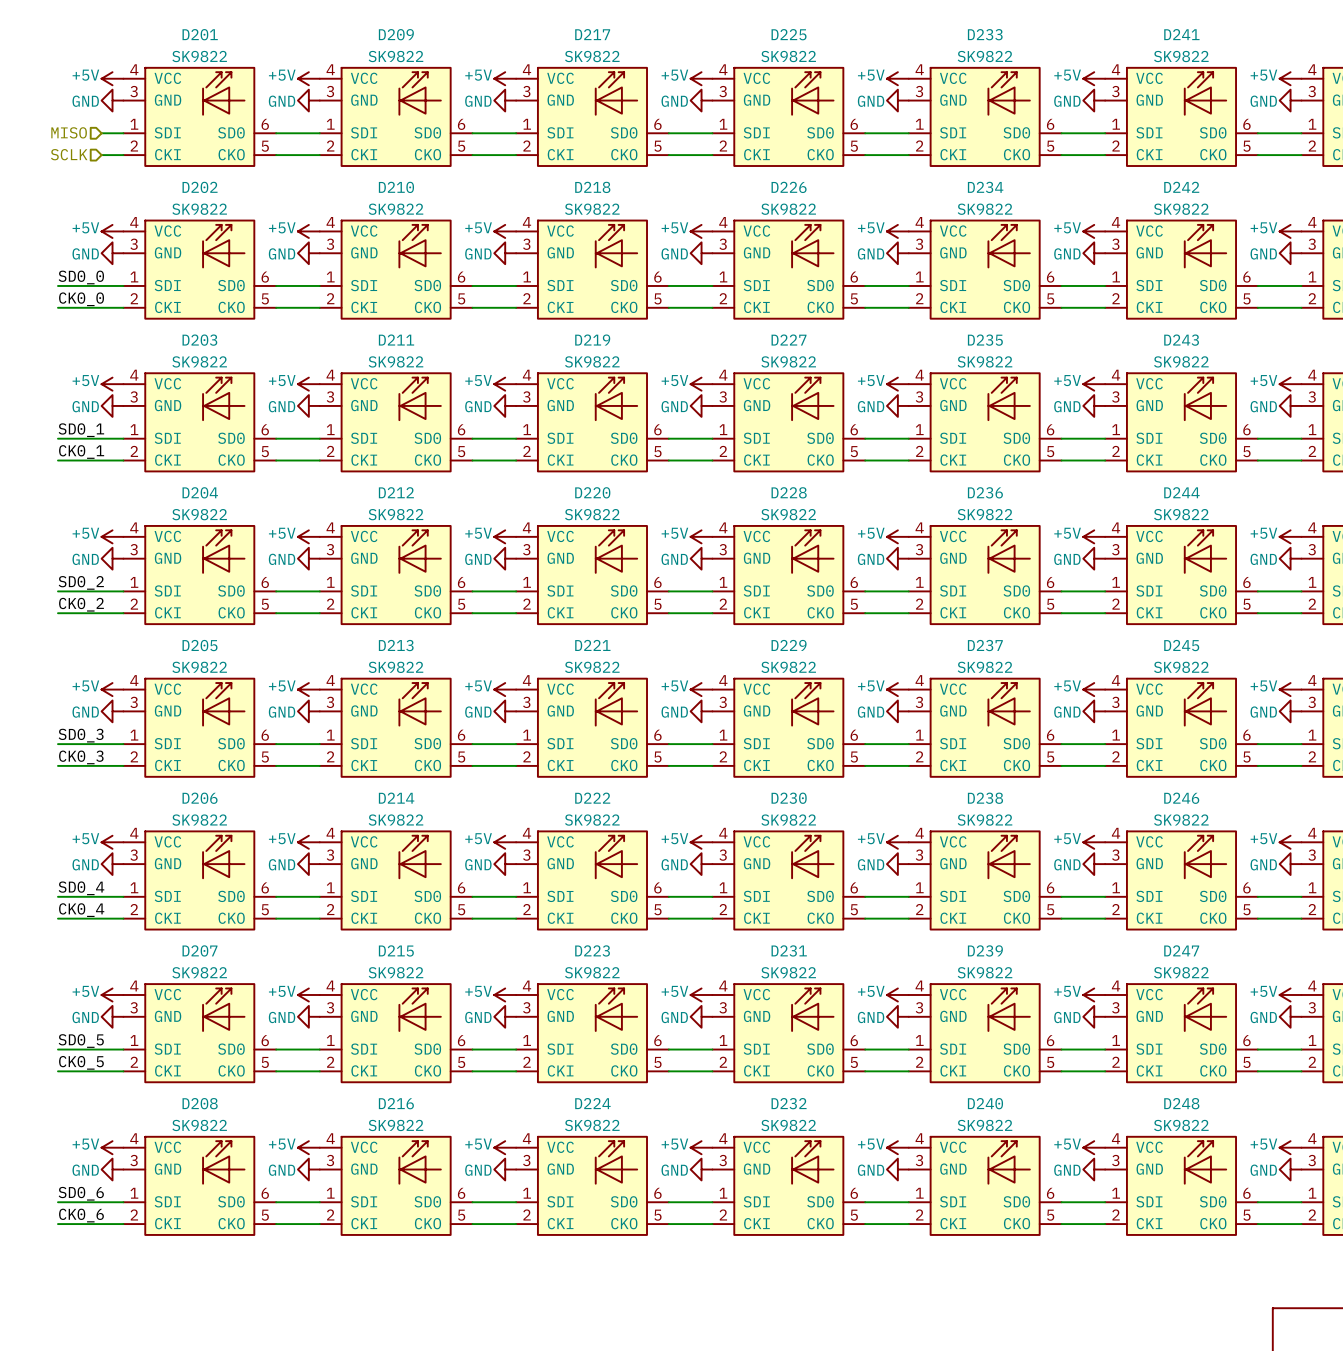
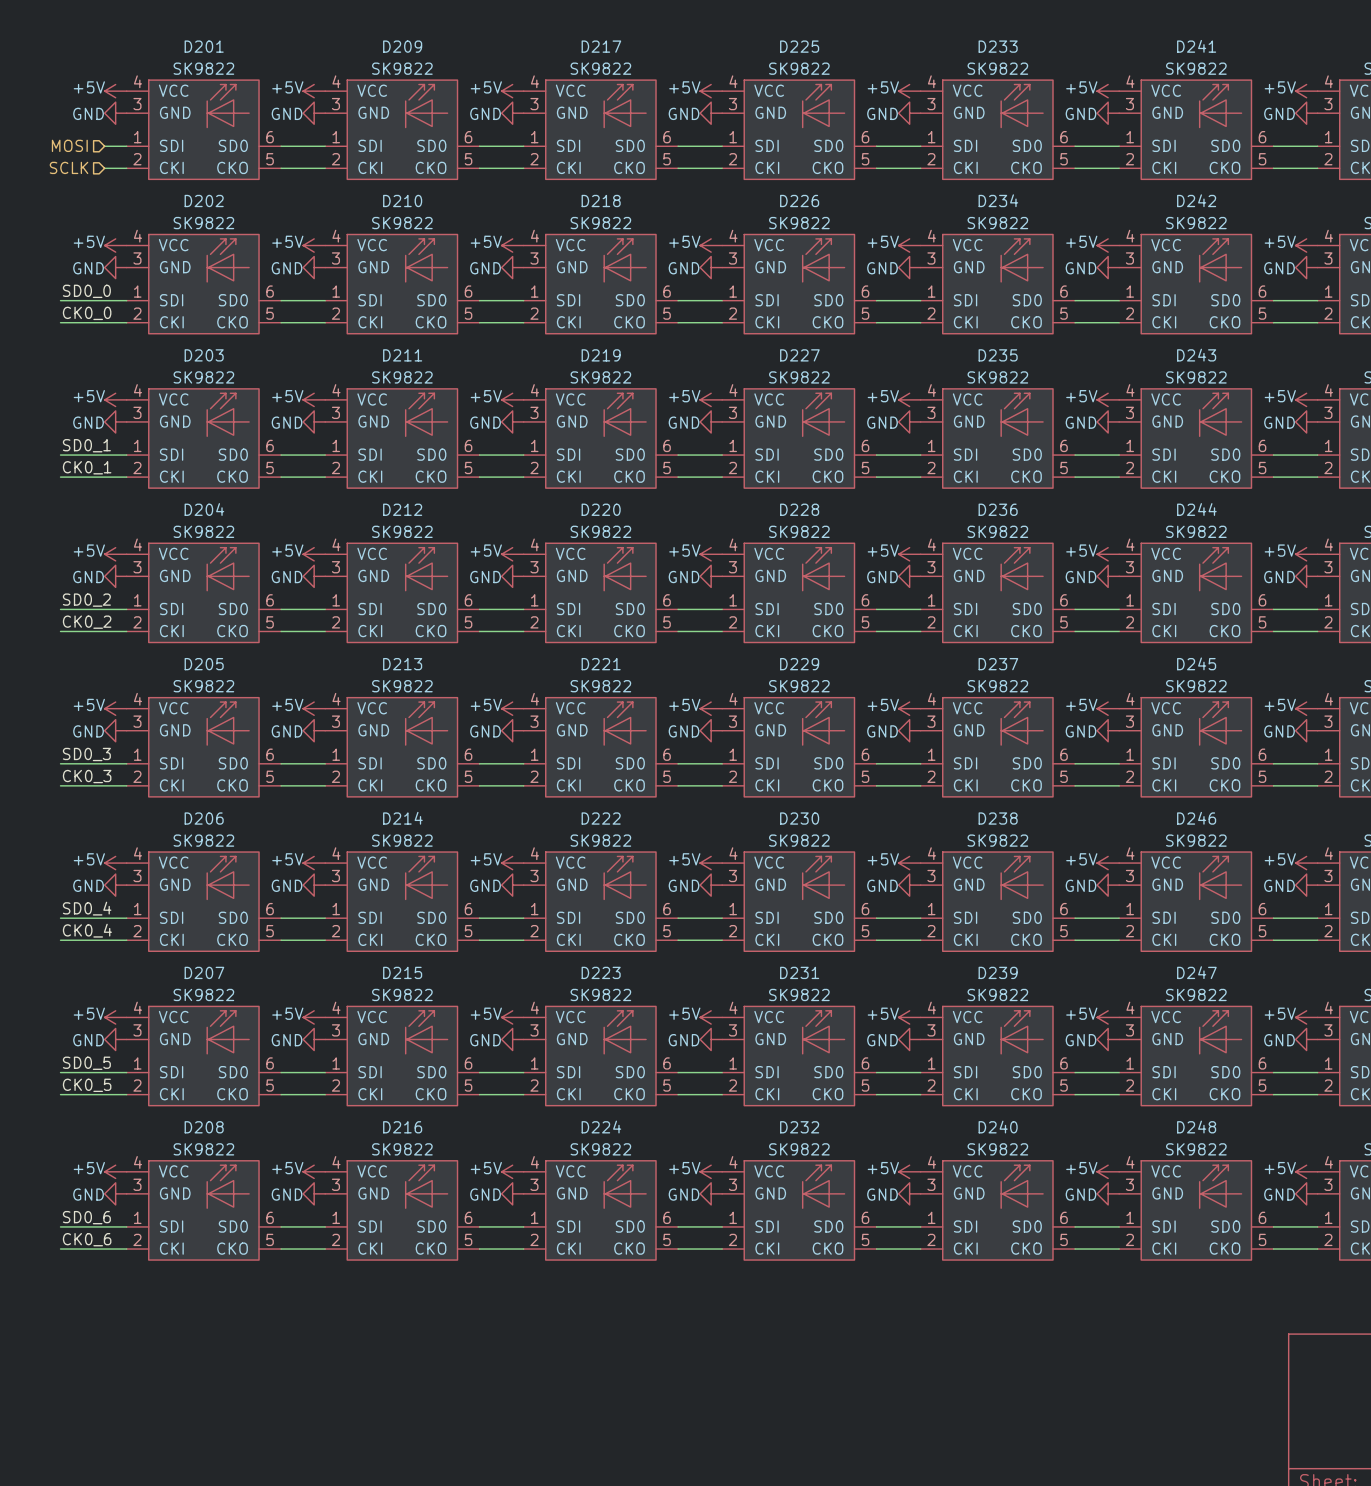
hierarchical label: MISO (69, 132) -> MOSI (69, 145)

